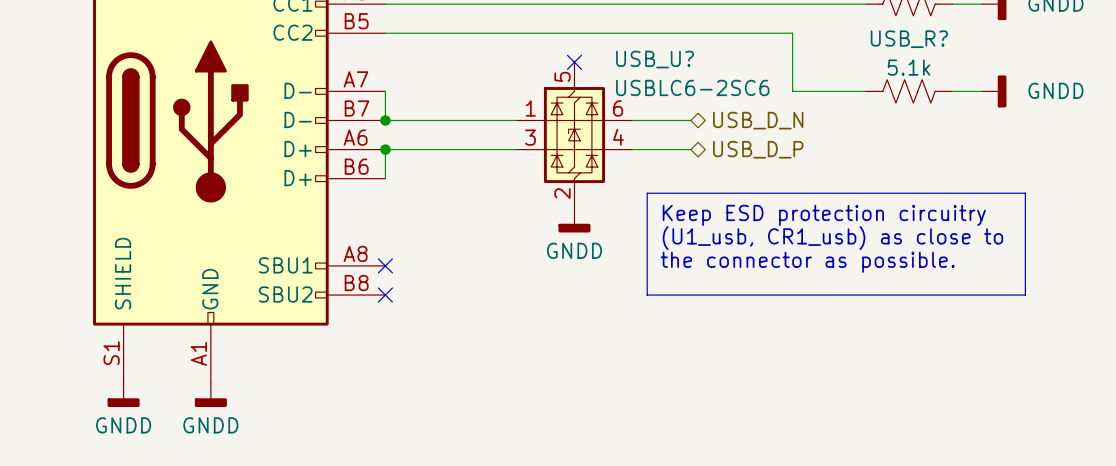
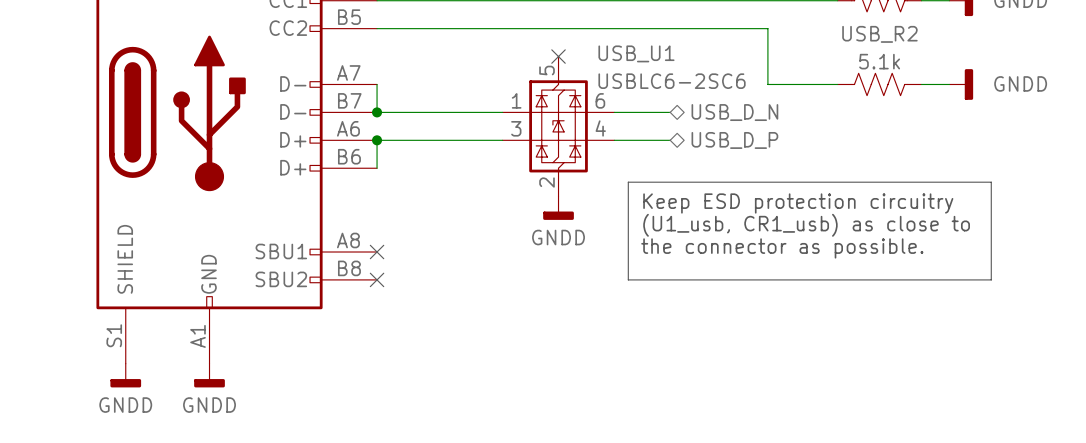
USB_R? name: USB_R? (909, 39) -> USB_R2 (879, 34)
USB_U? name: USB_U? (655, 59) -> USB_U1 (636, 53)

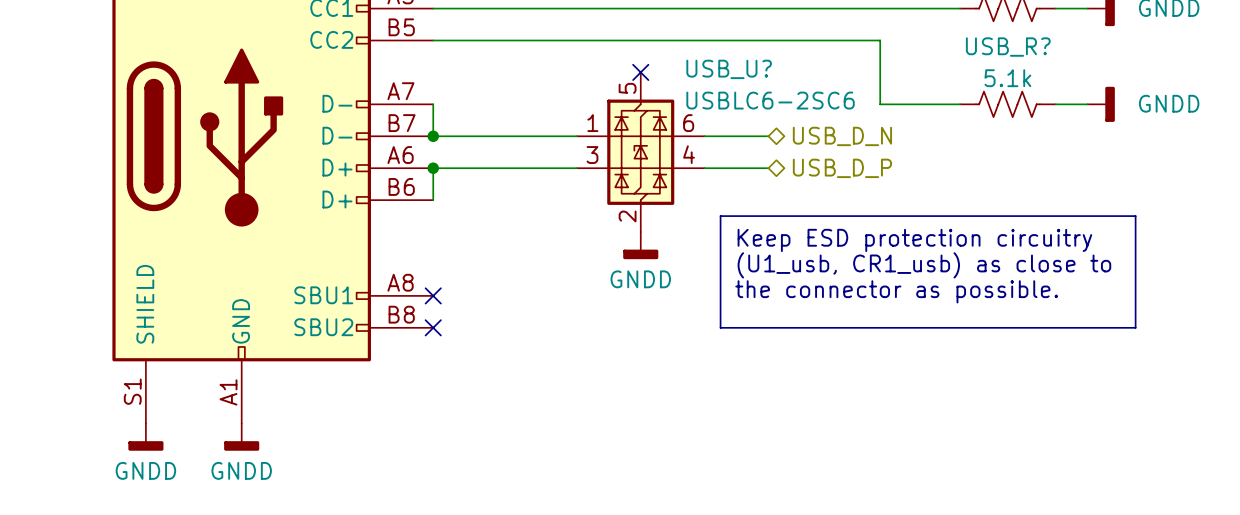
USB_R2 name: USB_R2 (879, 34) -> USB_R? (1008, 47)
USB_U1 name: USB_U1 (636, 53) -> USB_U? (729, 69)

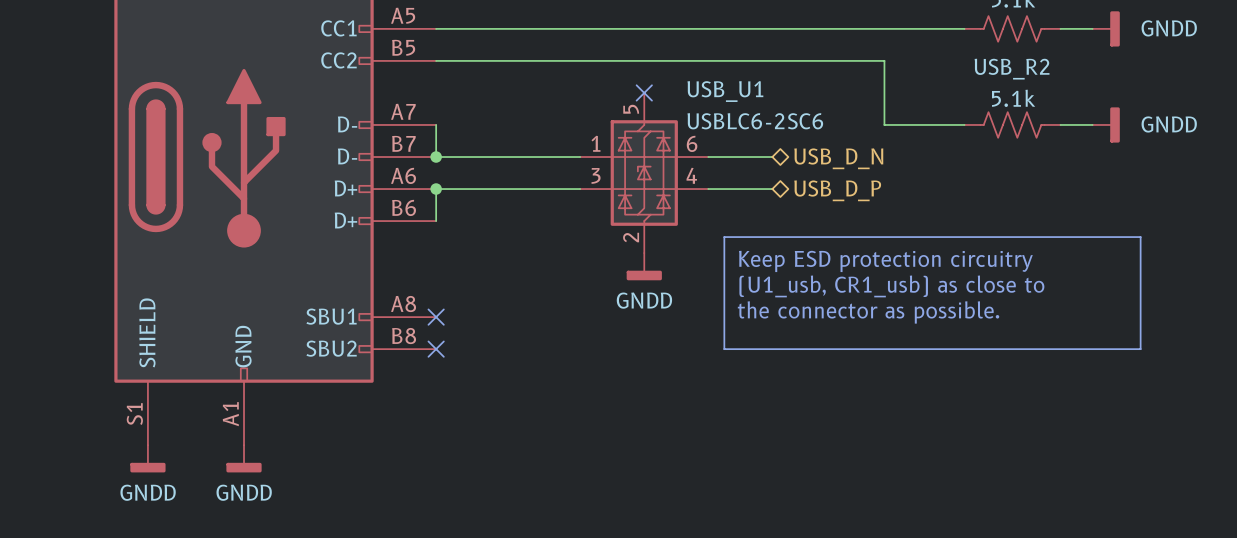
USB_R? name: USB_R? (1008, 47) -> USB_R2 (1012, 69)
USB_U? name: USB_U? (729, 69) -> USB_U1 (725, 91)

